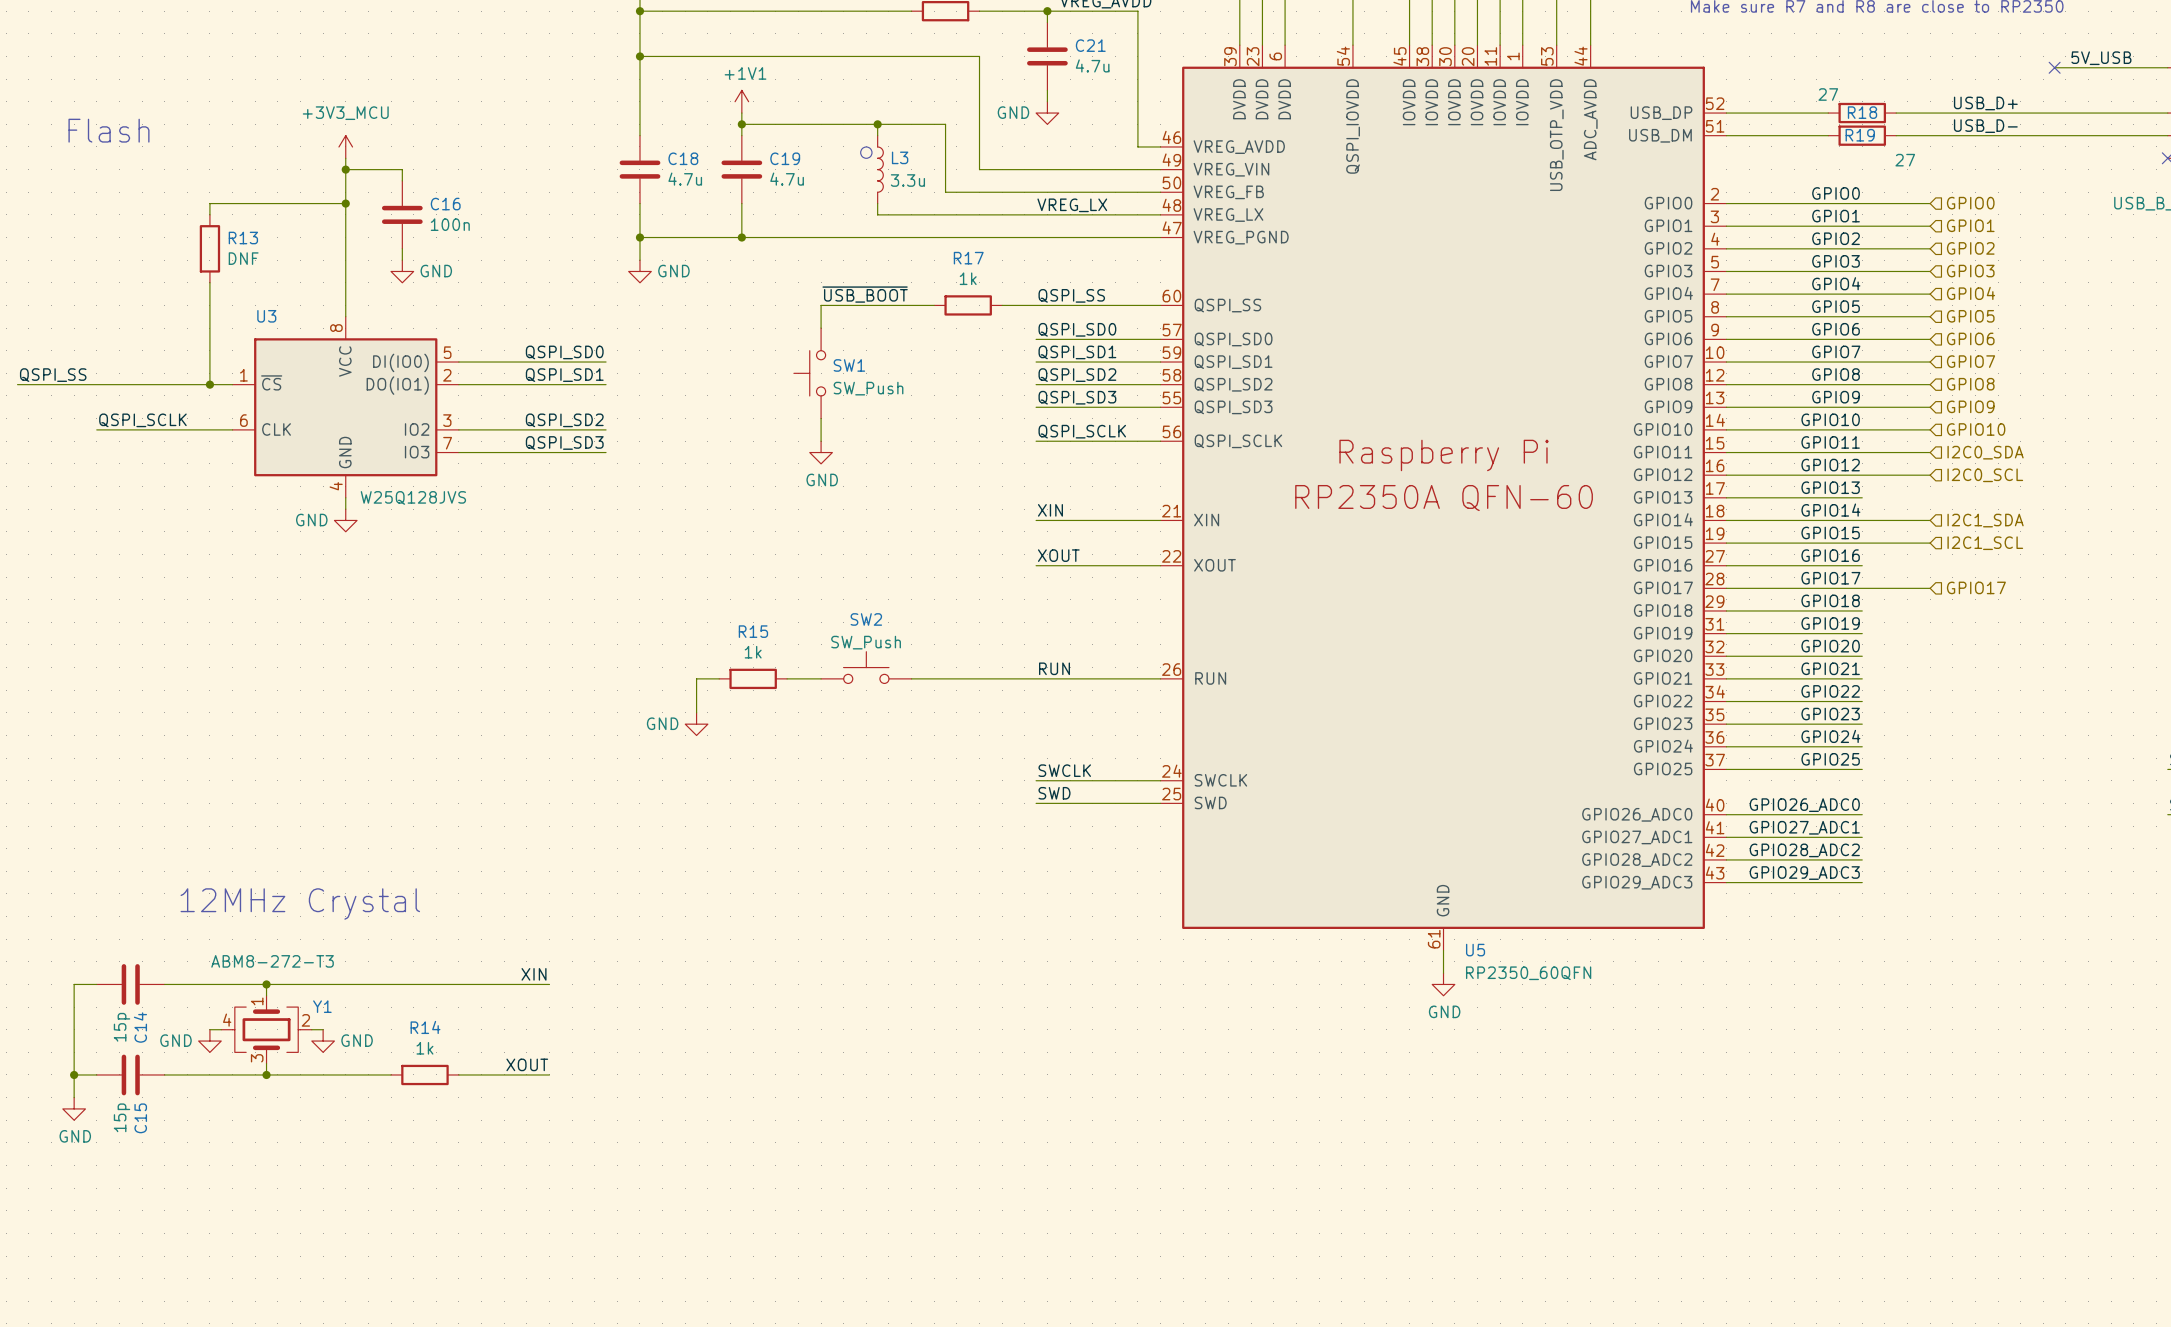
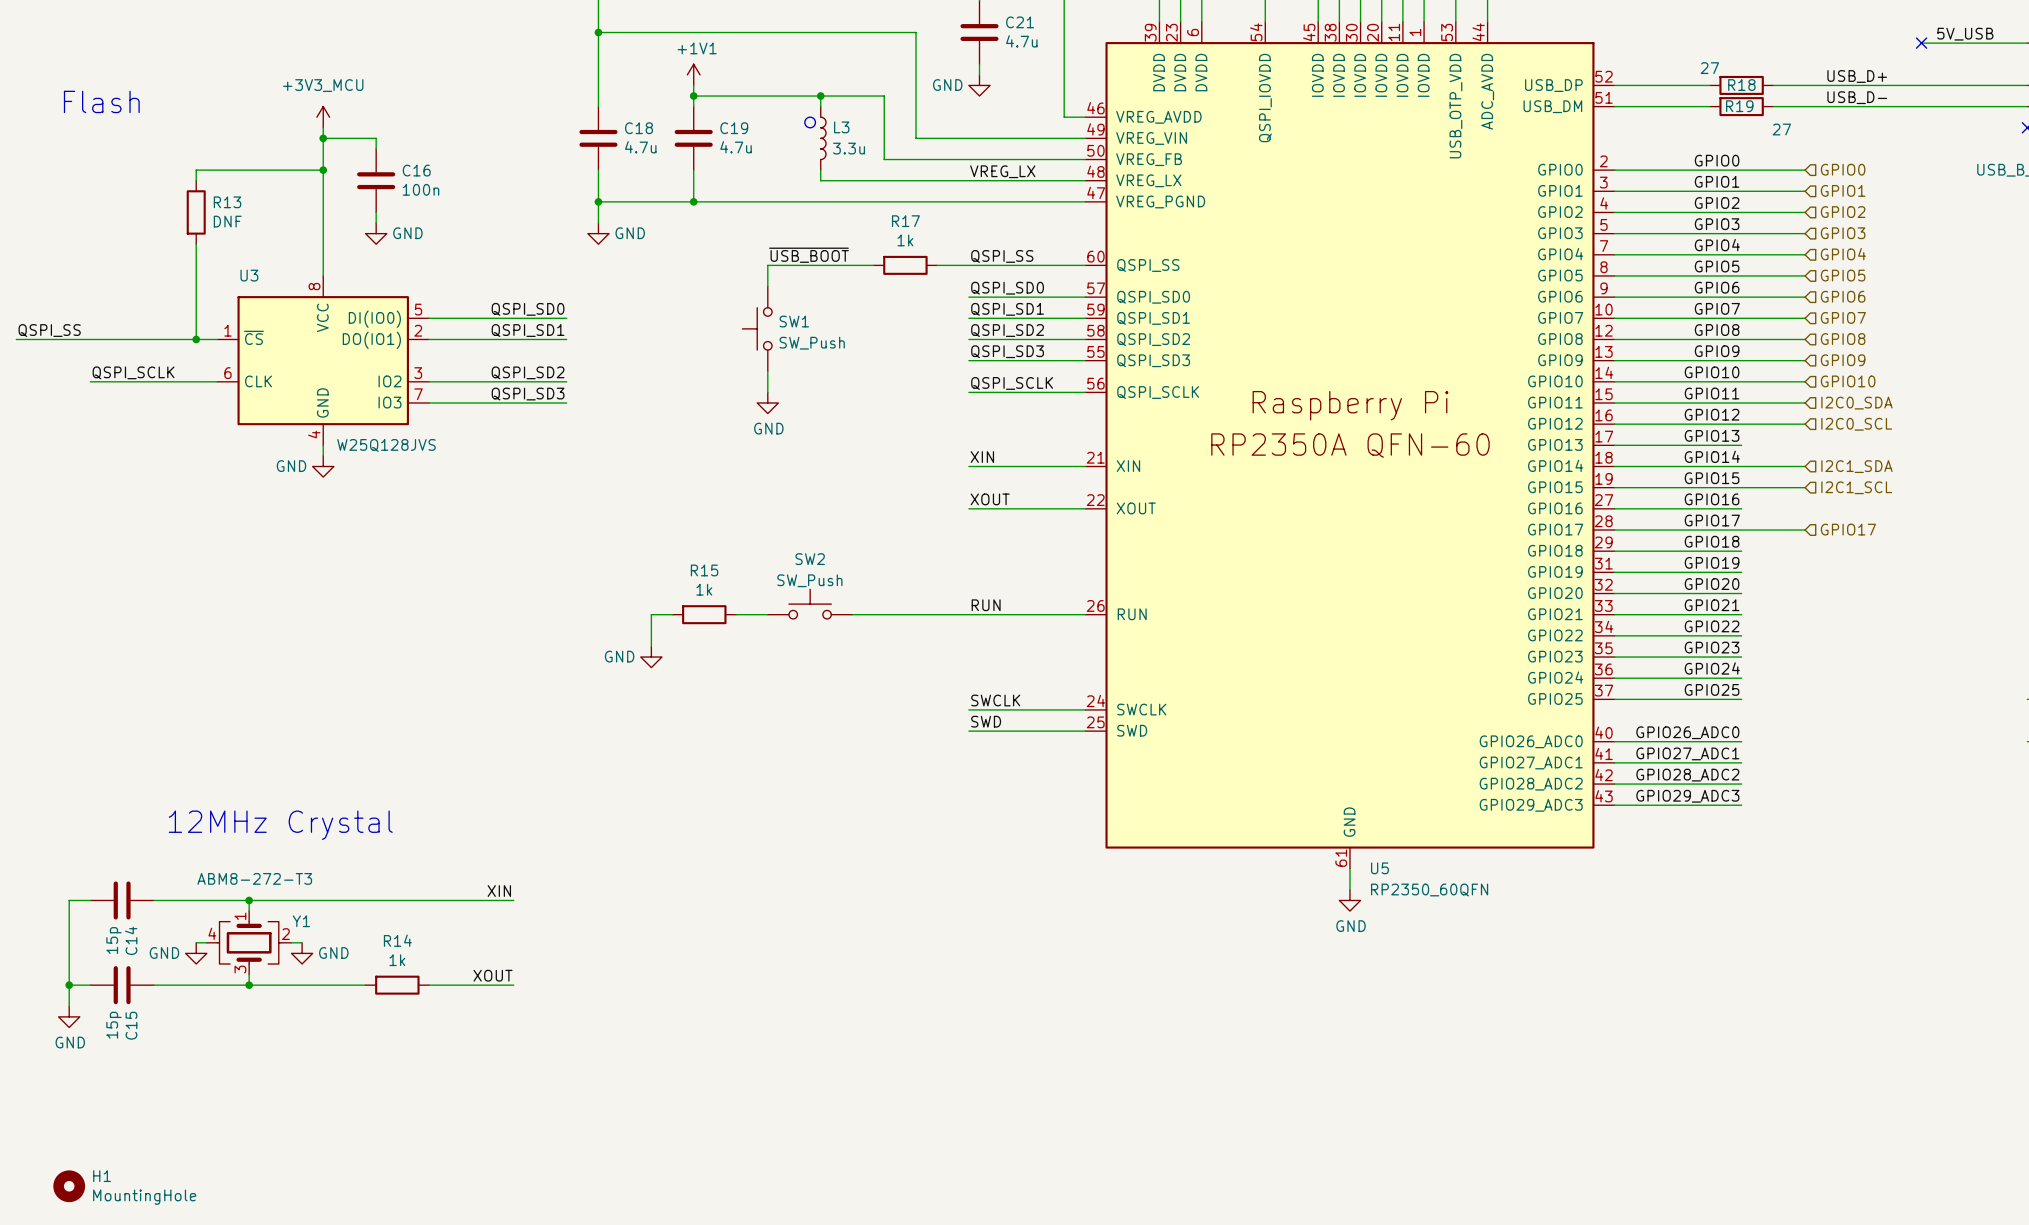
H1: none -> MountingHole (69, 1186)

